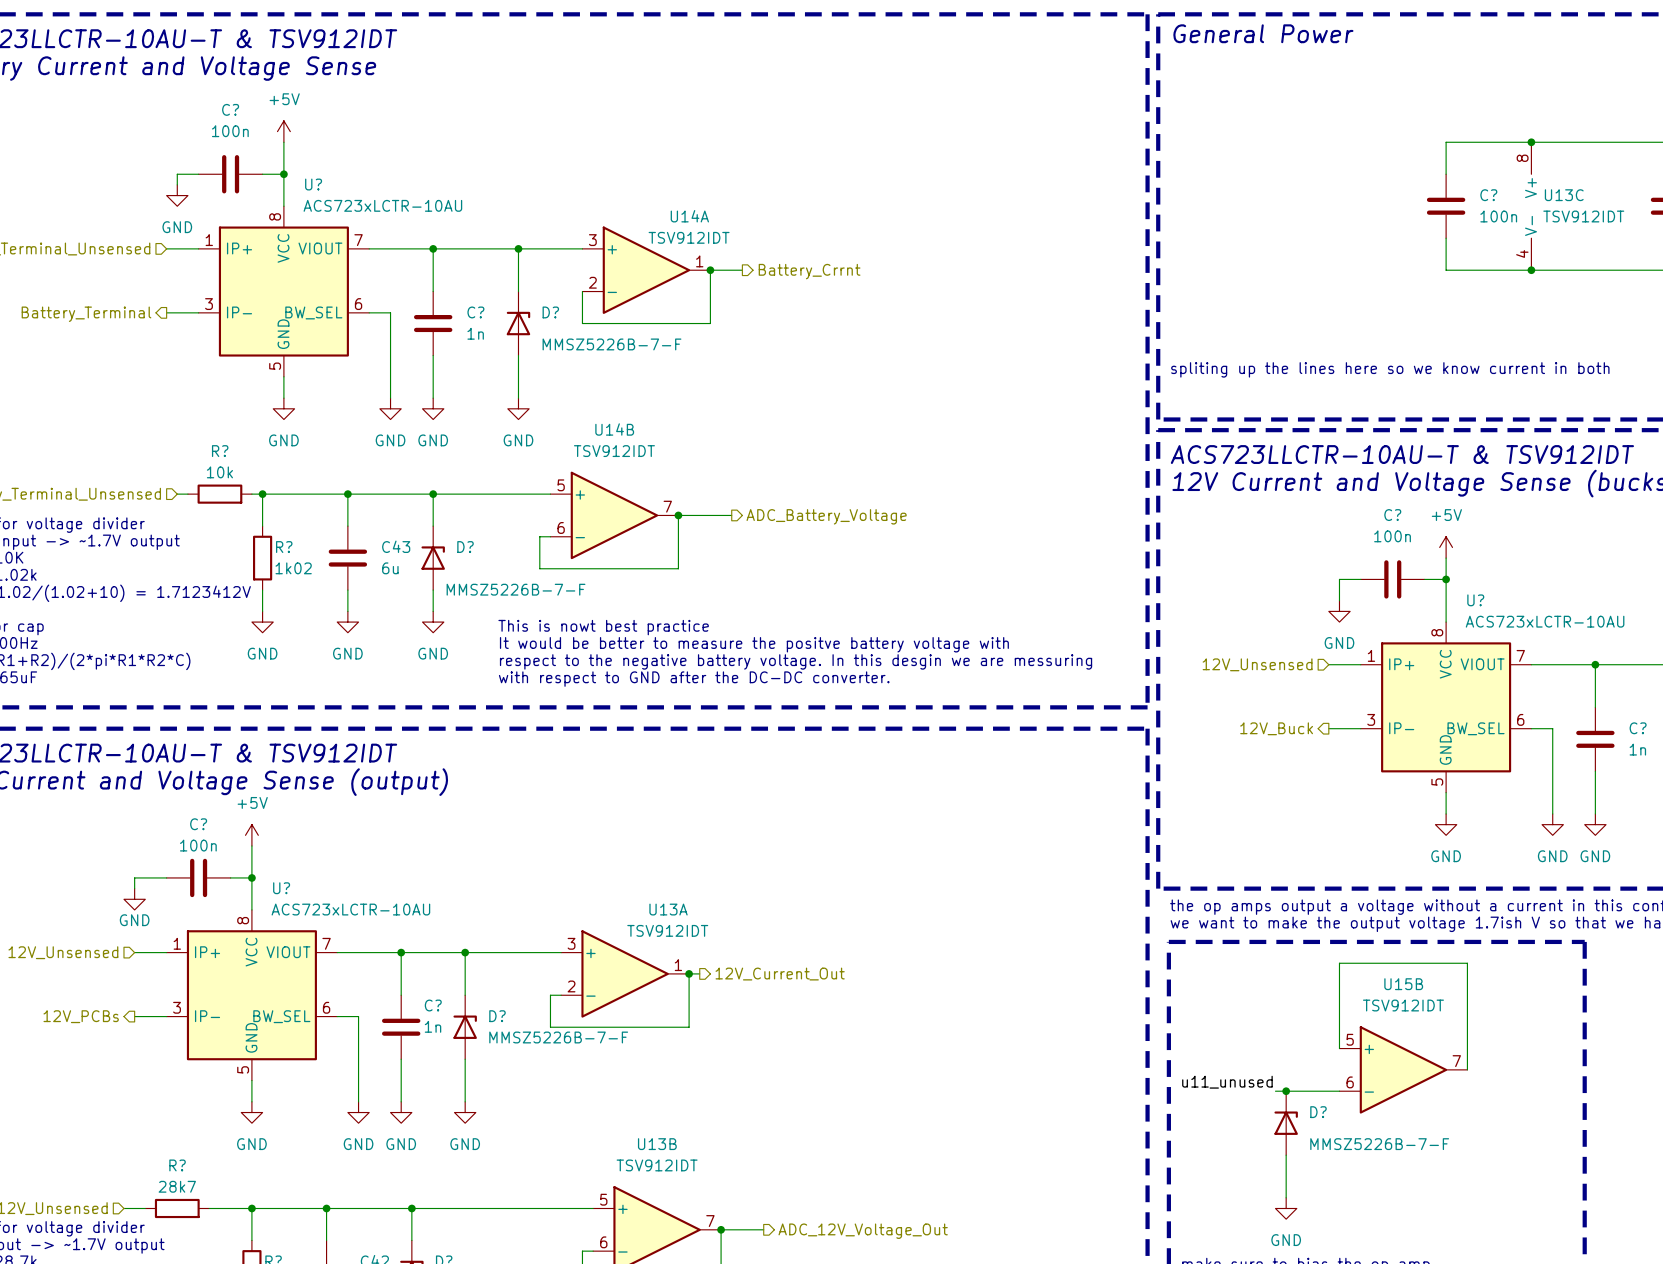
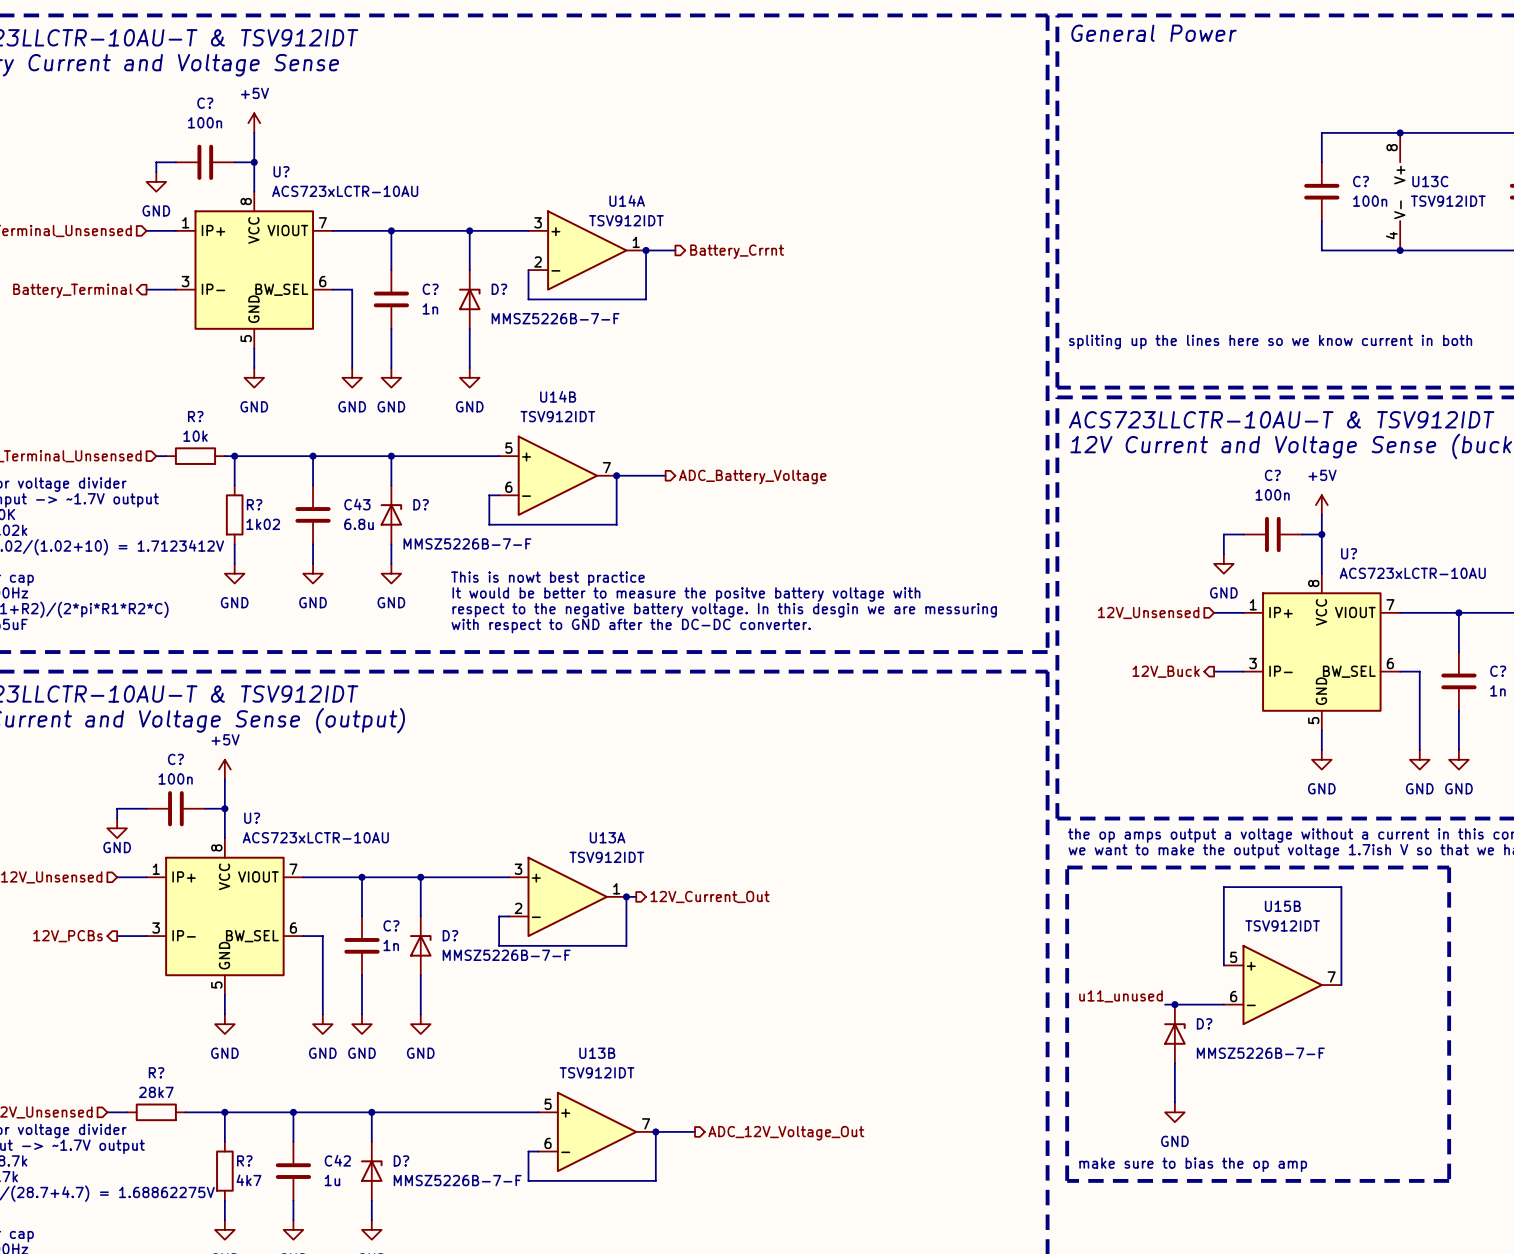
C43 value: 6u (390, 568) -> 6.8u (359, 524)

